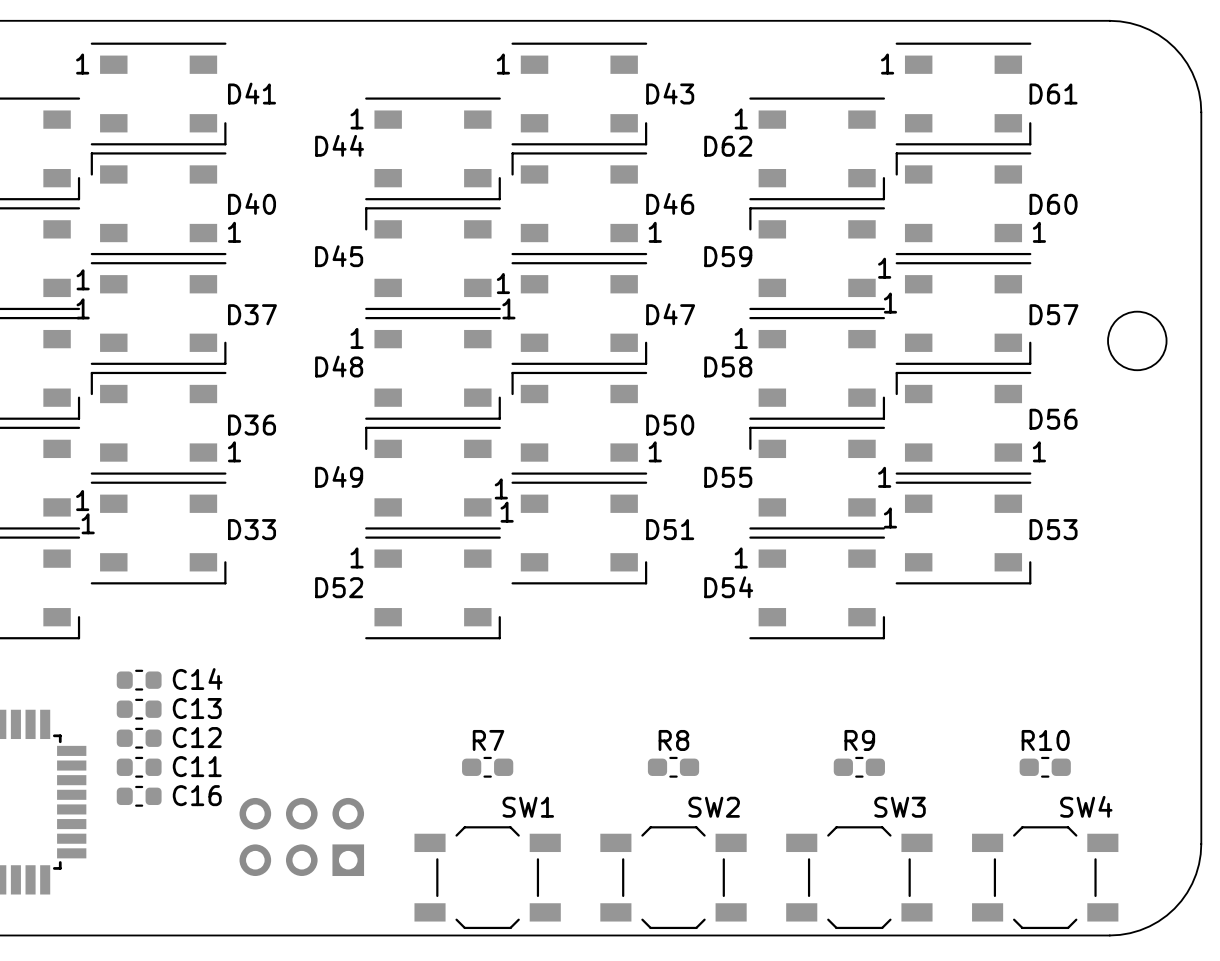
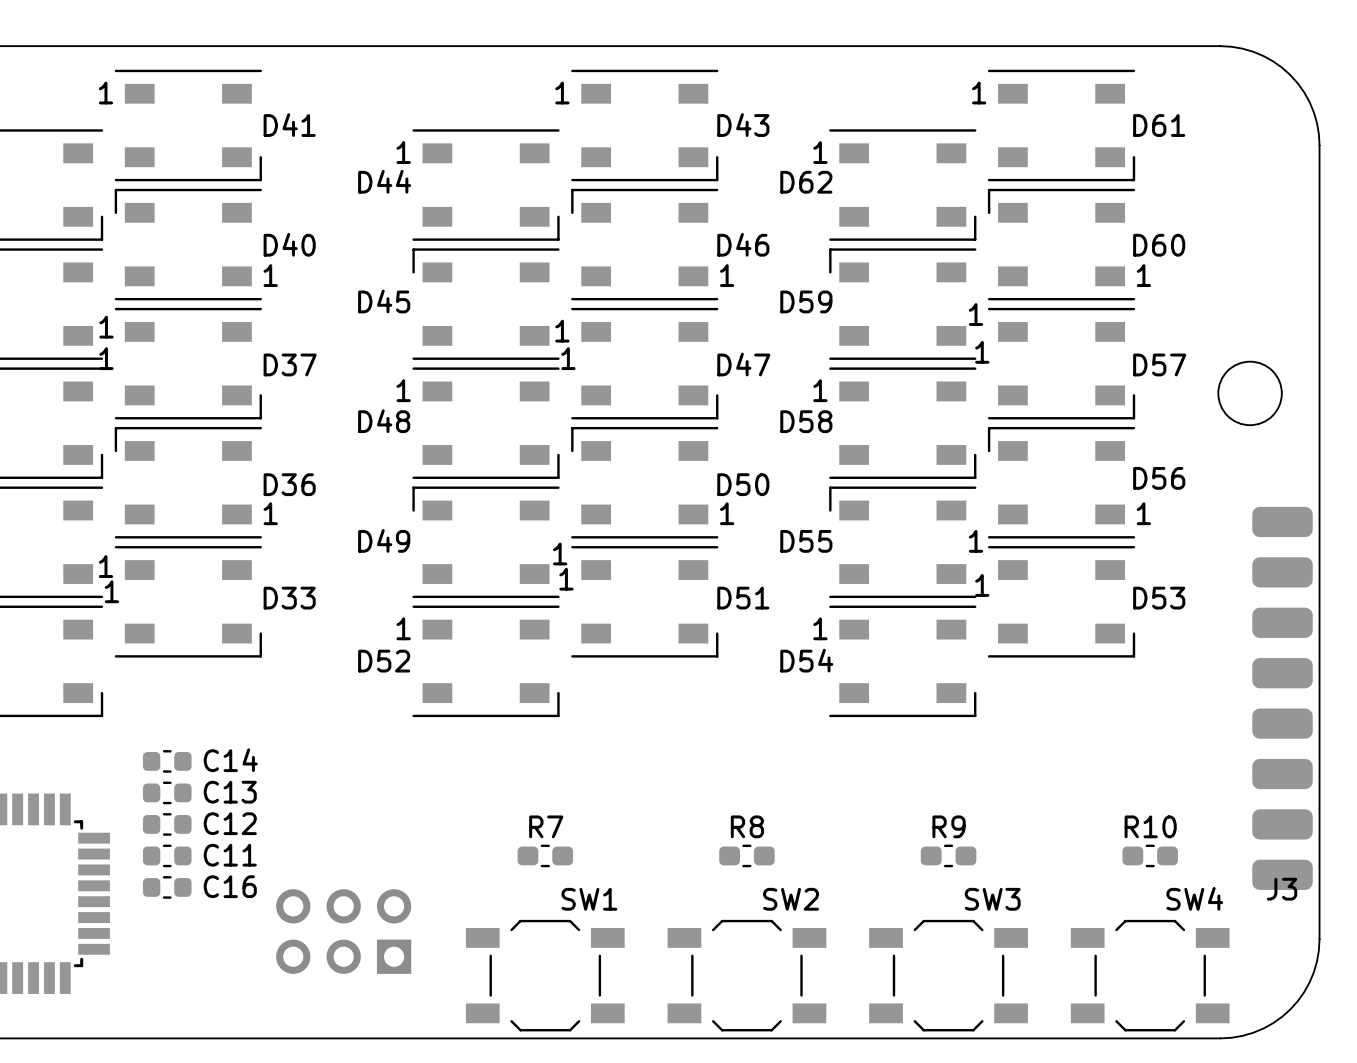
J3: none -> (1282, 698)

